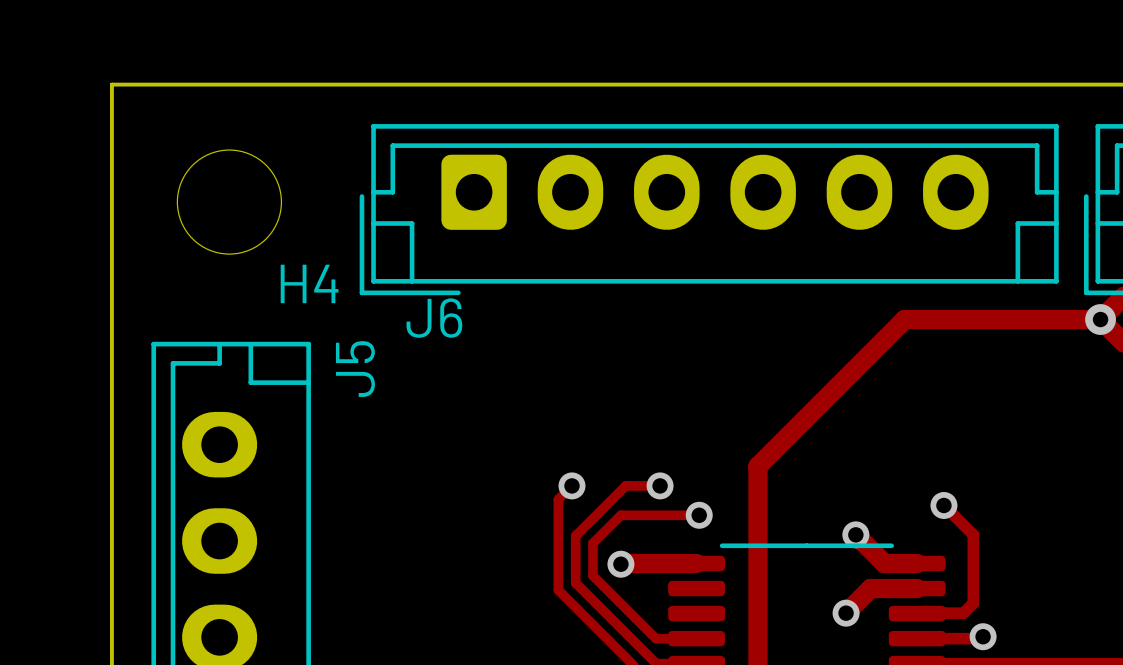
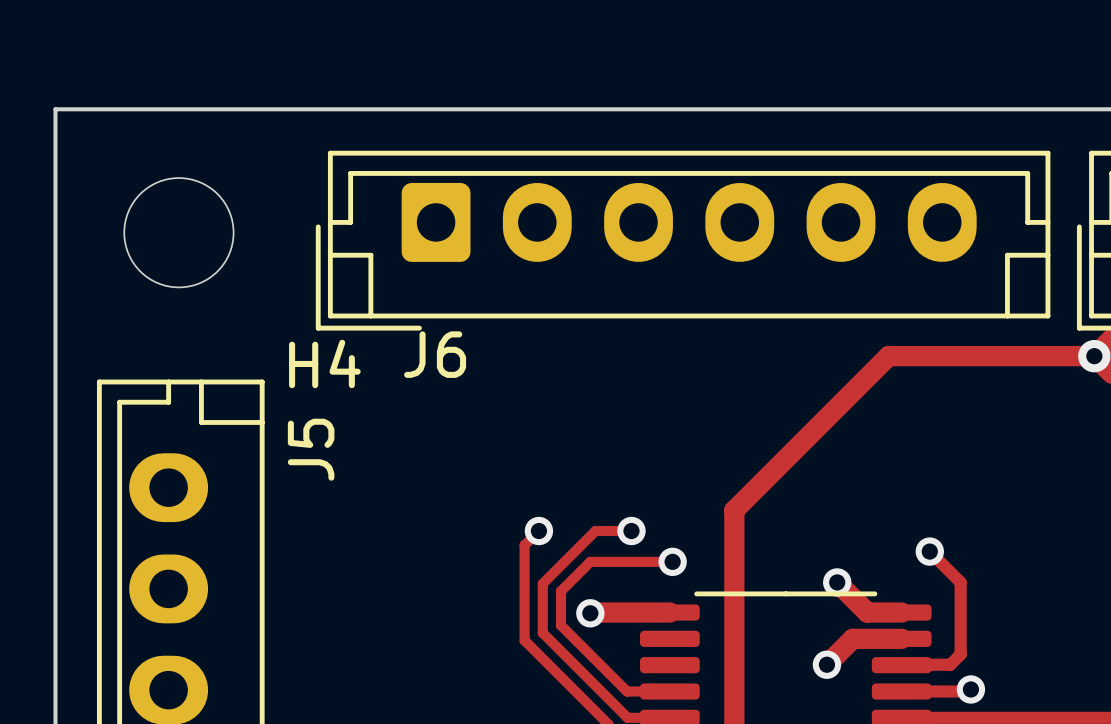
H4 name position: H4 (309, 283) -> H4 (324, 363)
J6 name position: J6 (434, 318) -> J6 (435, 354)
J5 name position: J5 (355, 369) -> J5 (311, 449)

